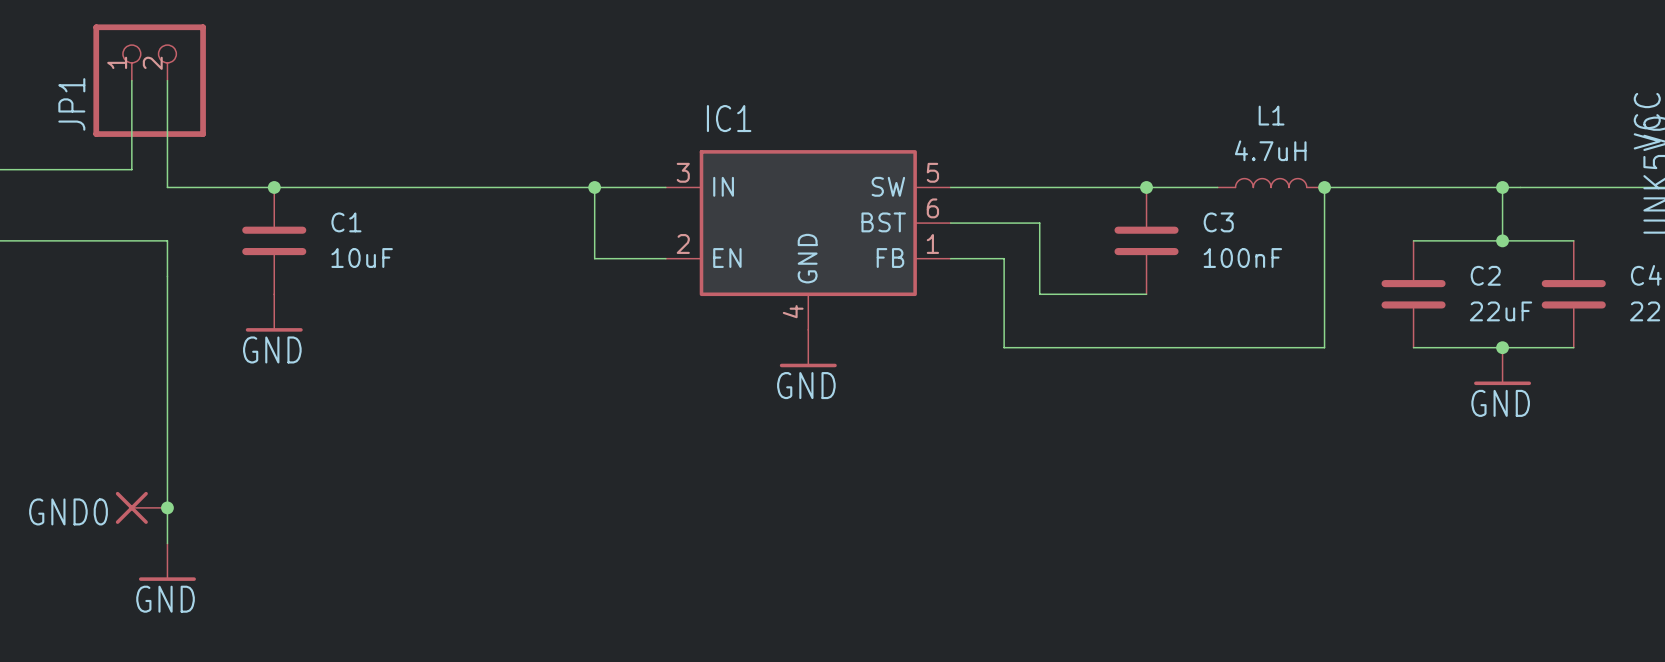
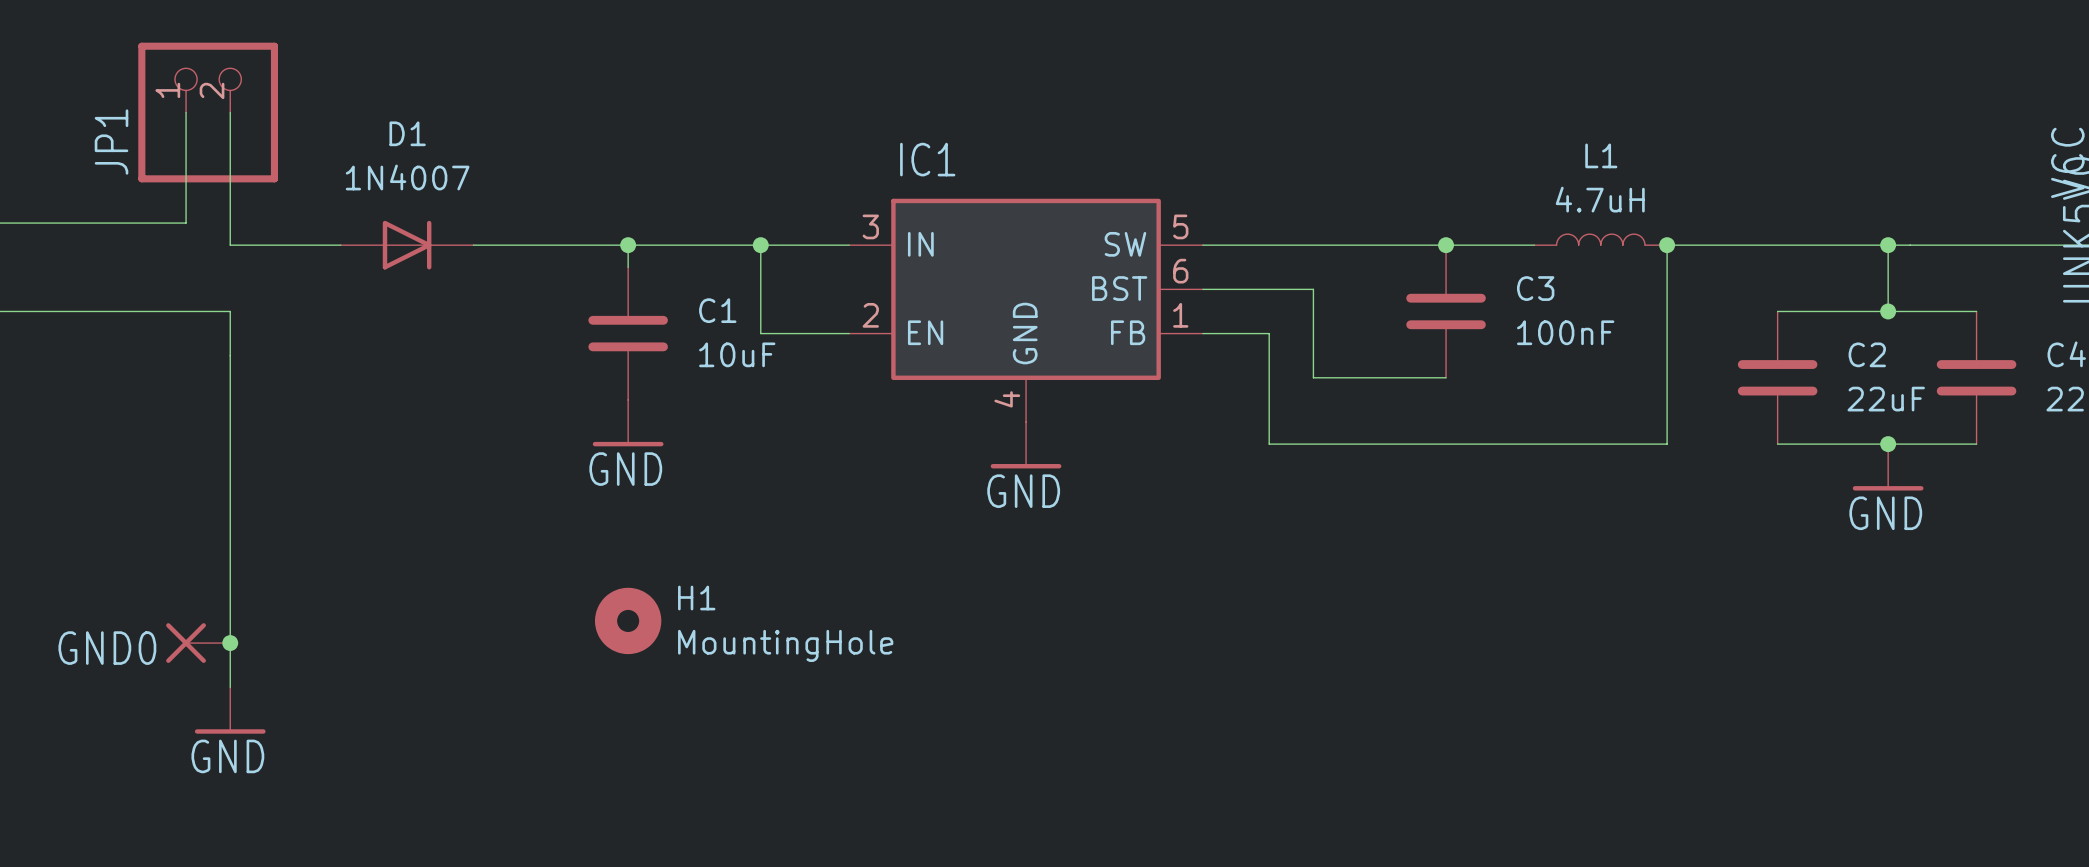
junction: (274, 187) -> none
D1: none -> 1N4007 (407, 245)
wire: none -> (628, 245) (628, 267)
junction: none -> (628, 245)
C1 position: (274, 240) -> (628, 333)
power symbol position: GND (274, 312) -> GND (628, 423)
H1: none -> MountingHole (628, 620)

